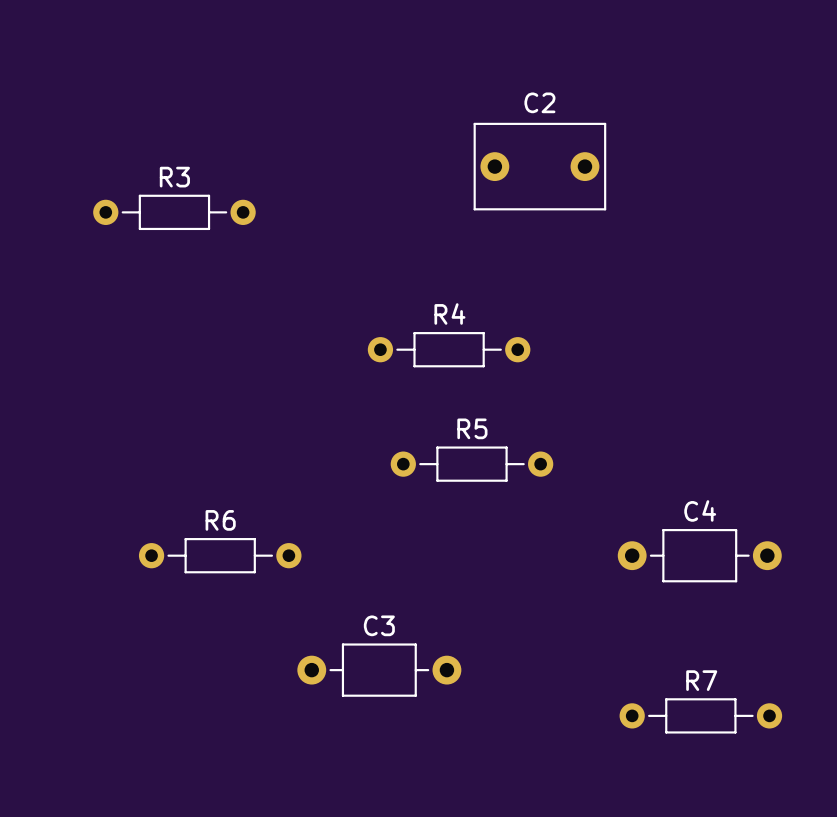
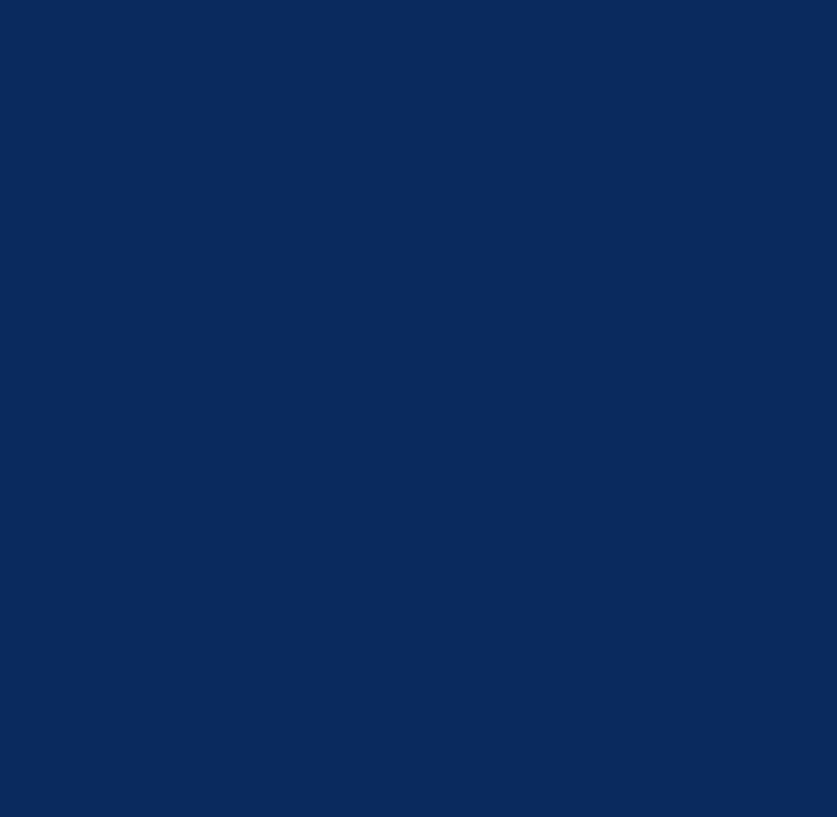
C2: (539, 166) -> none
R3: (174, 212) -> none
R4: (449, 349) -> none
R5: (471, 464) -> none
R6: (220, 555) -> none
C4: (699, 555) -> none
C3: (379, 670) -> none
R7: (700, 715) -> none

